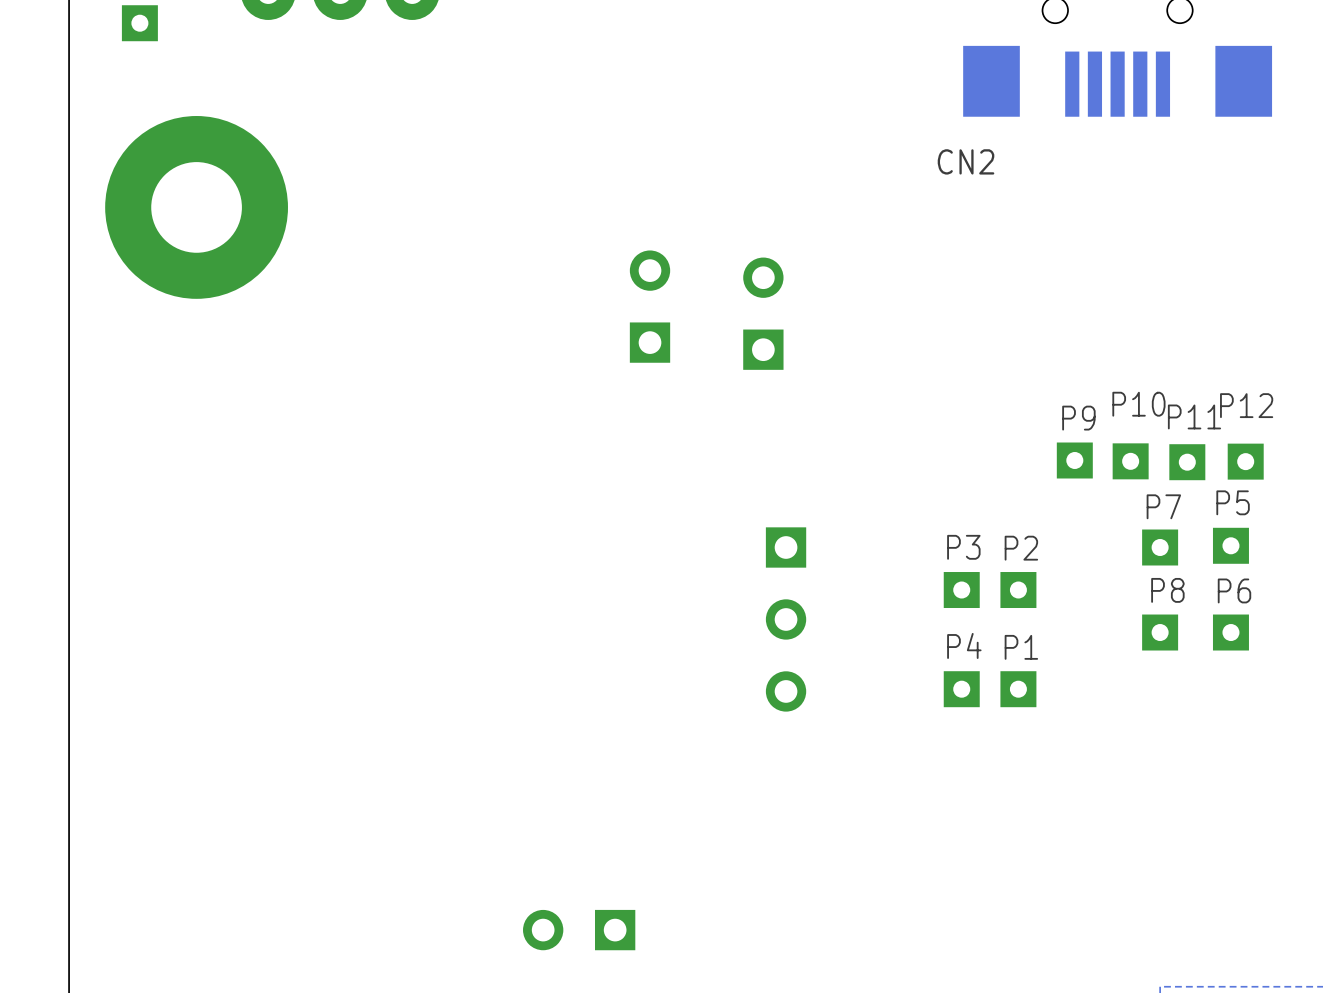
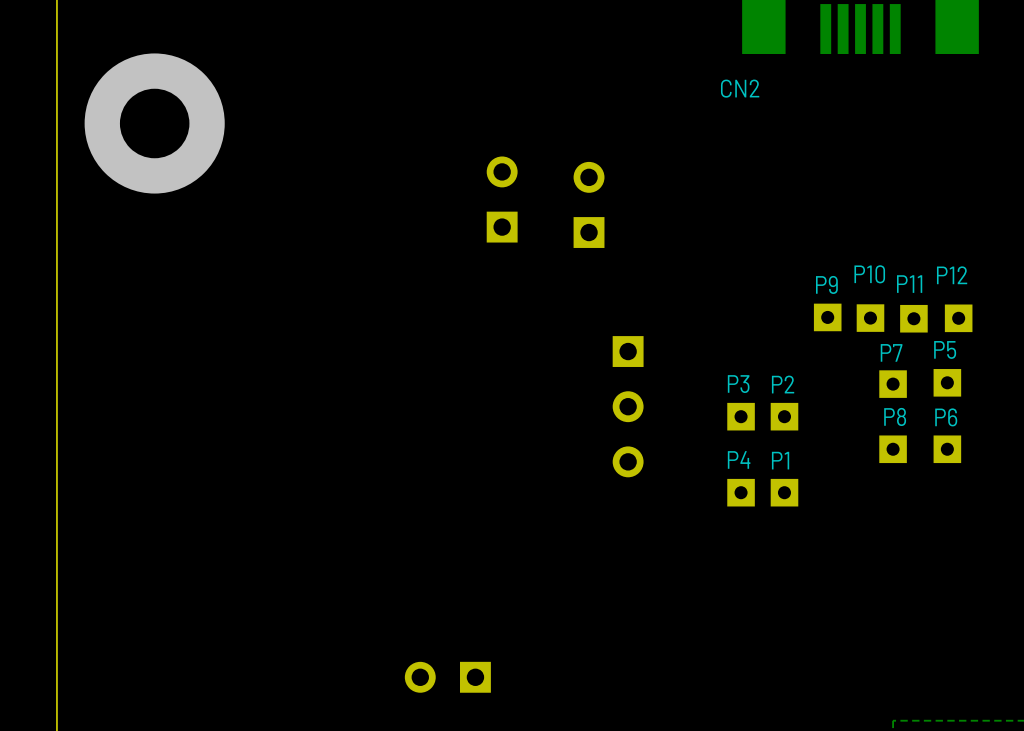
part position: (786, 619) -> (628, 406)

